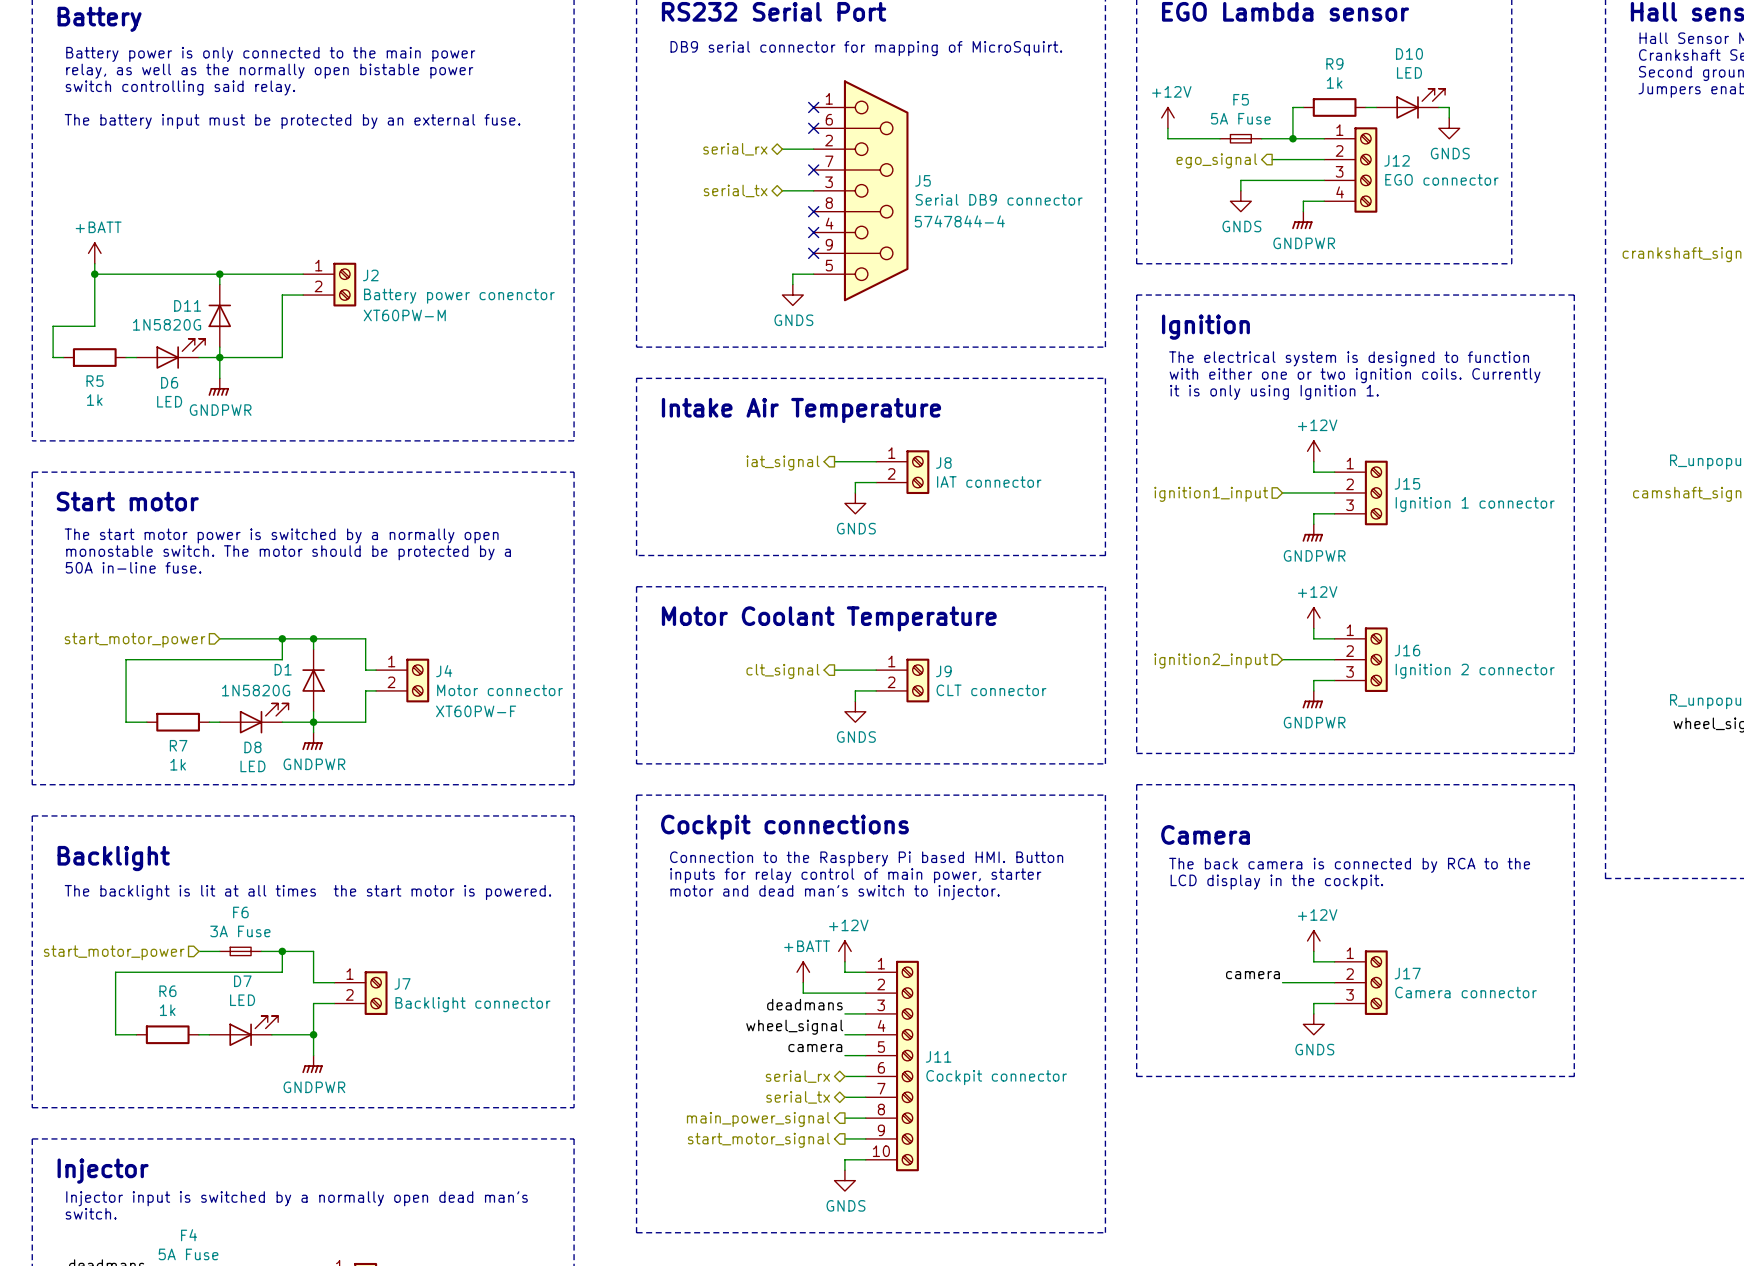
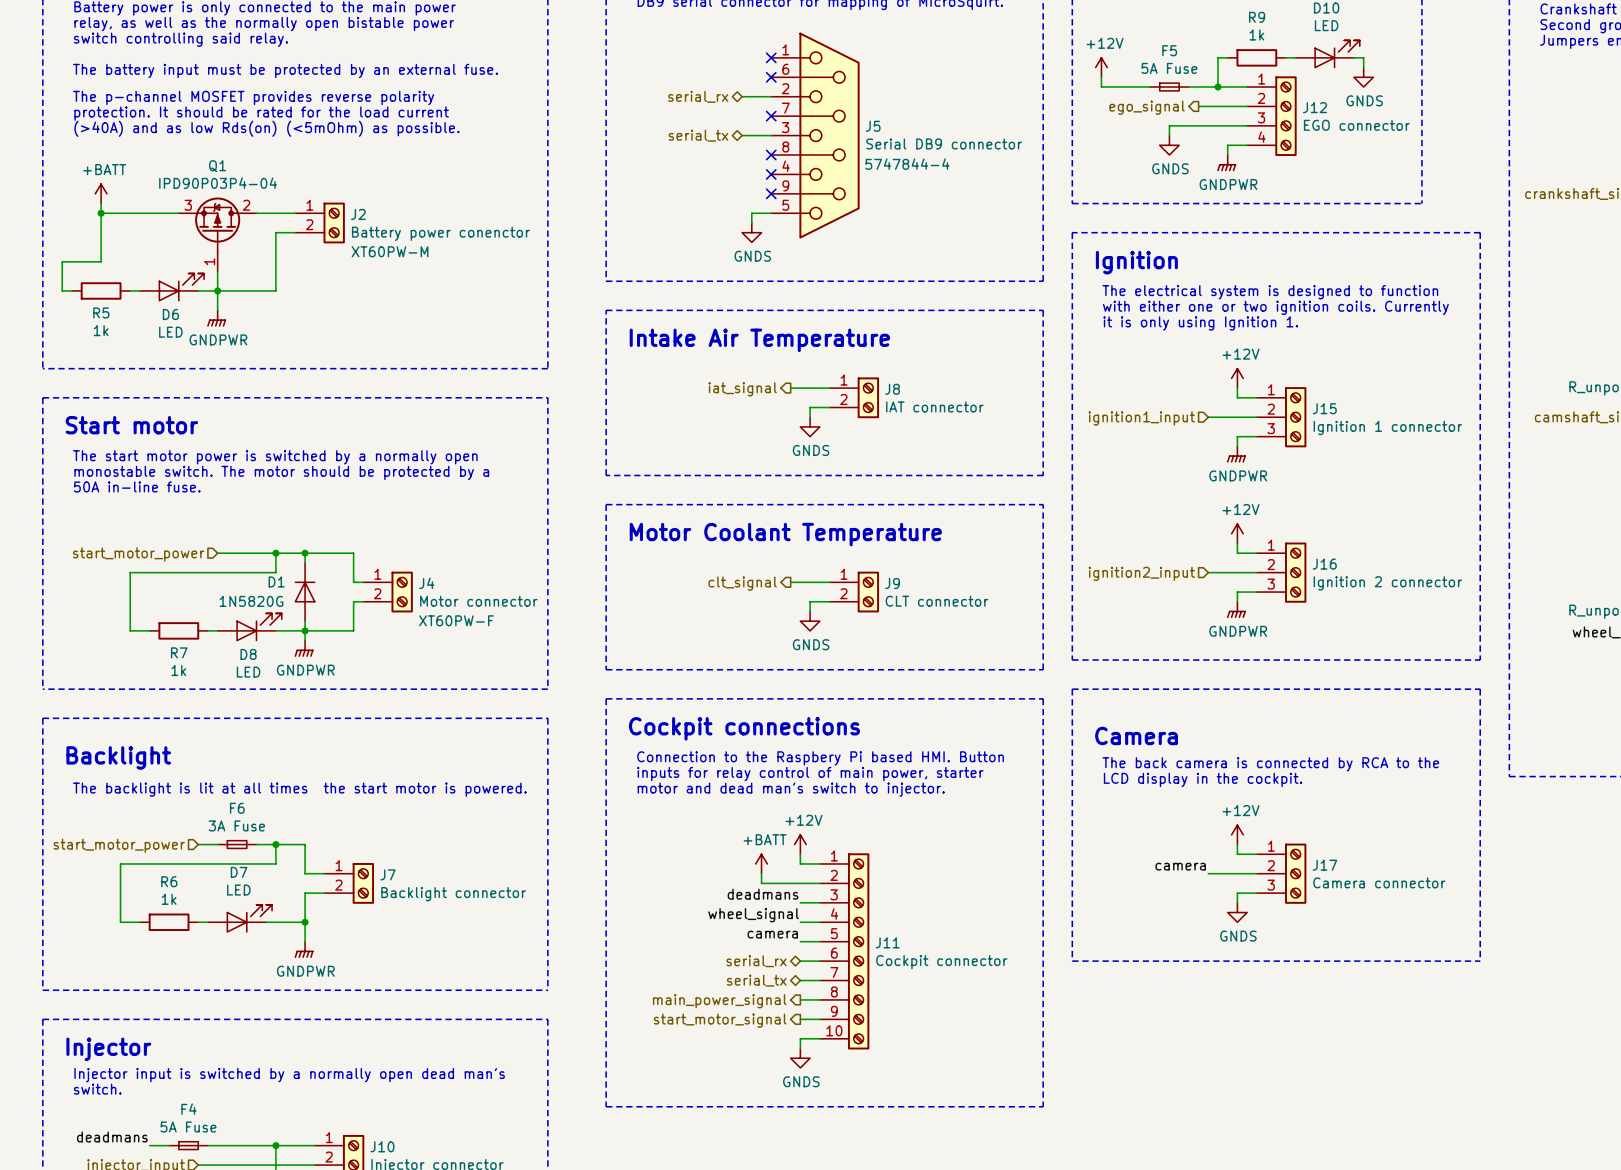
text: none -> The p-channel MOSFET provides reverse polarity (253, 97)
text: none -> protection. It should be rated for the load current (261, 113)
text: none -> (>40A) and as low Rds(on) (<5mOhm) as possible. (266, 128)
junction: (219, 274) -> none
Q1: none -> IPD90P03P4-04 (217, 234)
D11: 1N5820G (219, 315) -> none

